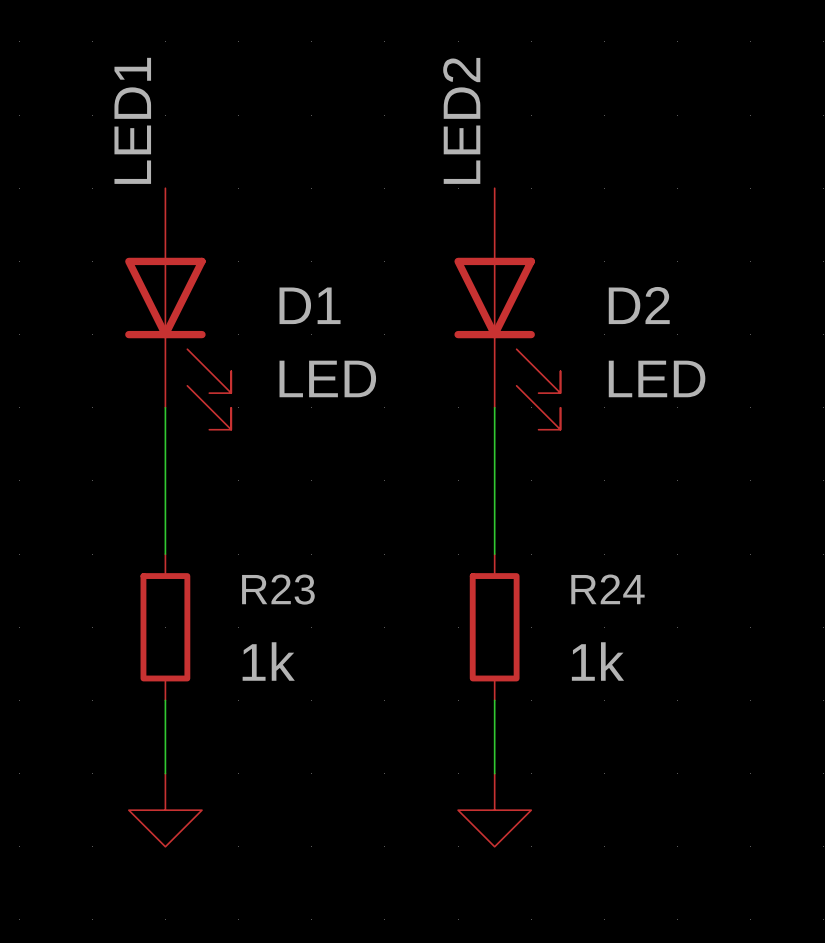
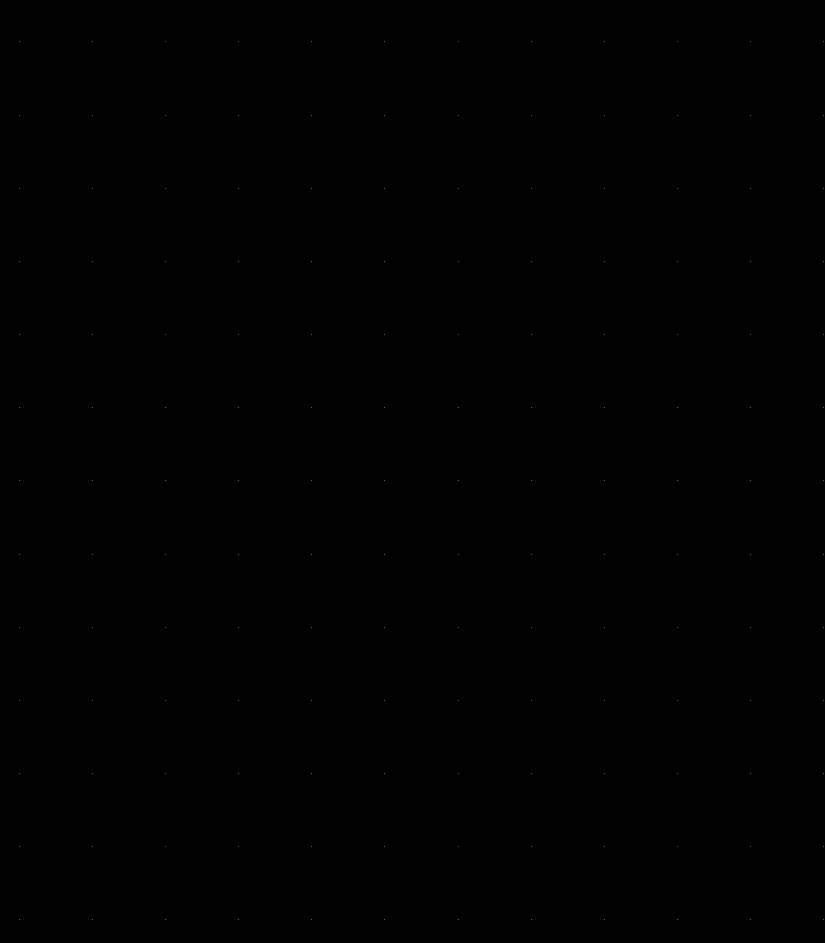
label: LED1 (132, 120) -> none
label: LED2 (461, 120) -> none
D1: LED (178, 308) -> none
D2: LED (507, 308) -> none
wire: (165, 407) (165, 554) -> none
wire: (494, 407) (494, 554) -> none
R23: 1k (165, 627) -> none
R24: 1k (494, 627) -> none
wire: (165, 700) (165, 773) -> none
wire: (494, 700) (494, 773) -> none
power symbol: (165, 810) -> none
power symbol: (494, 810) -> none

